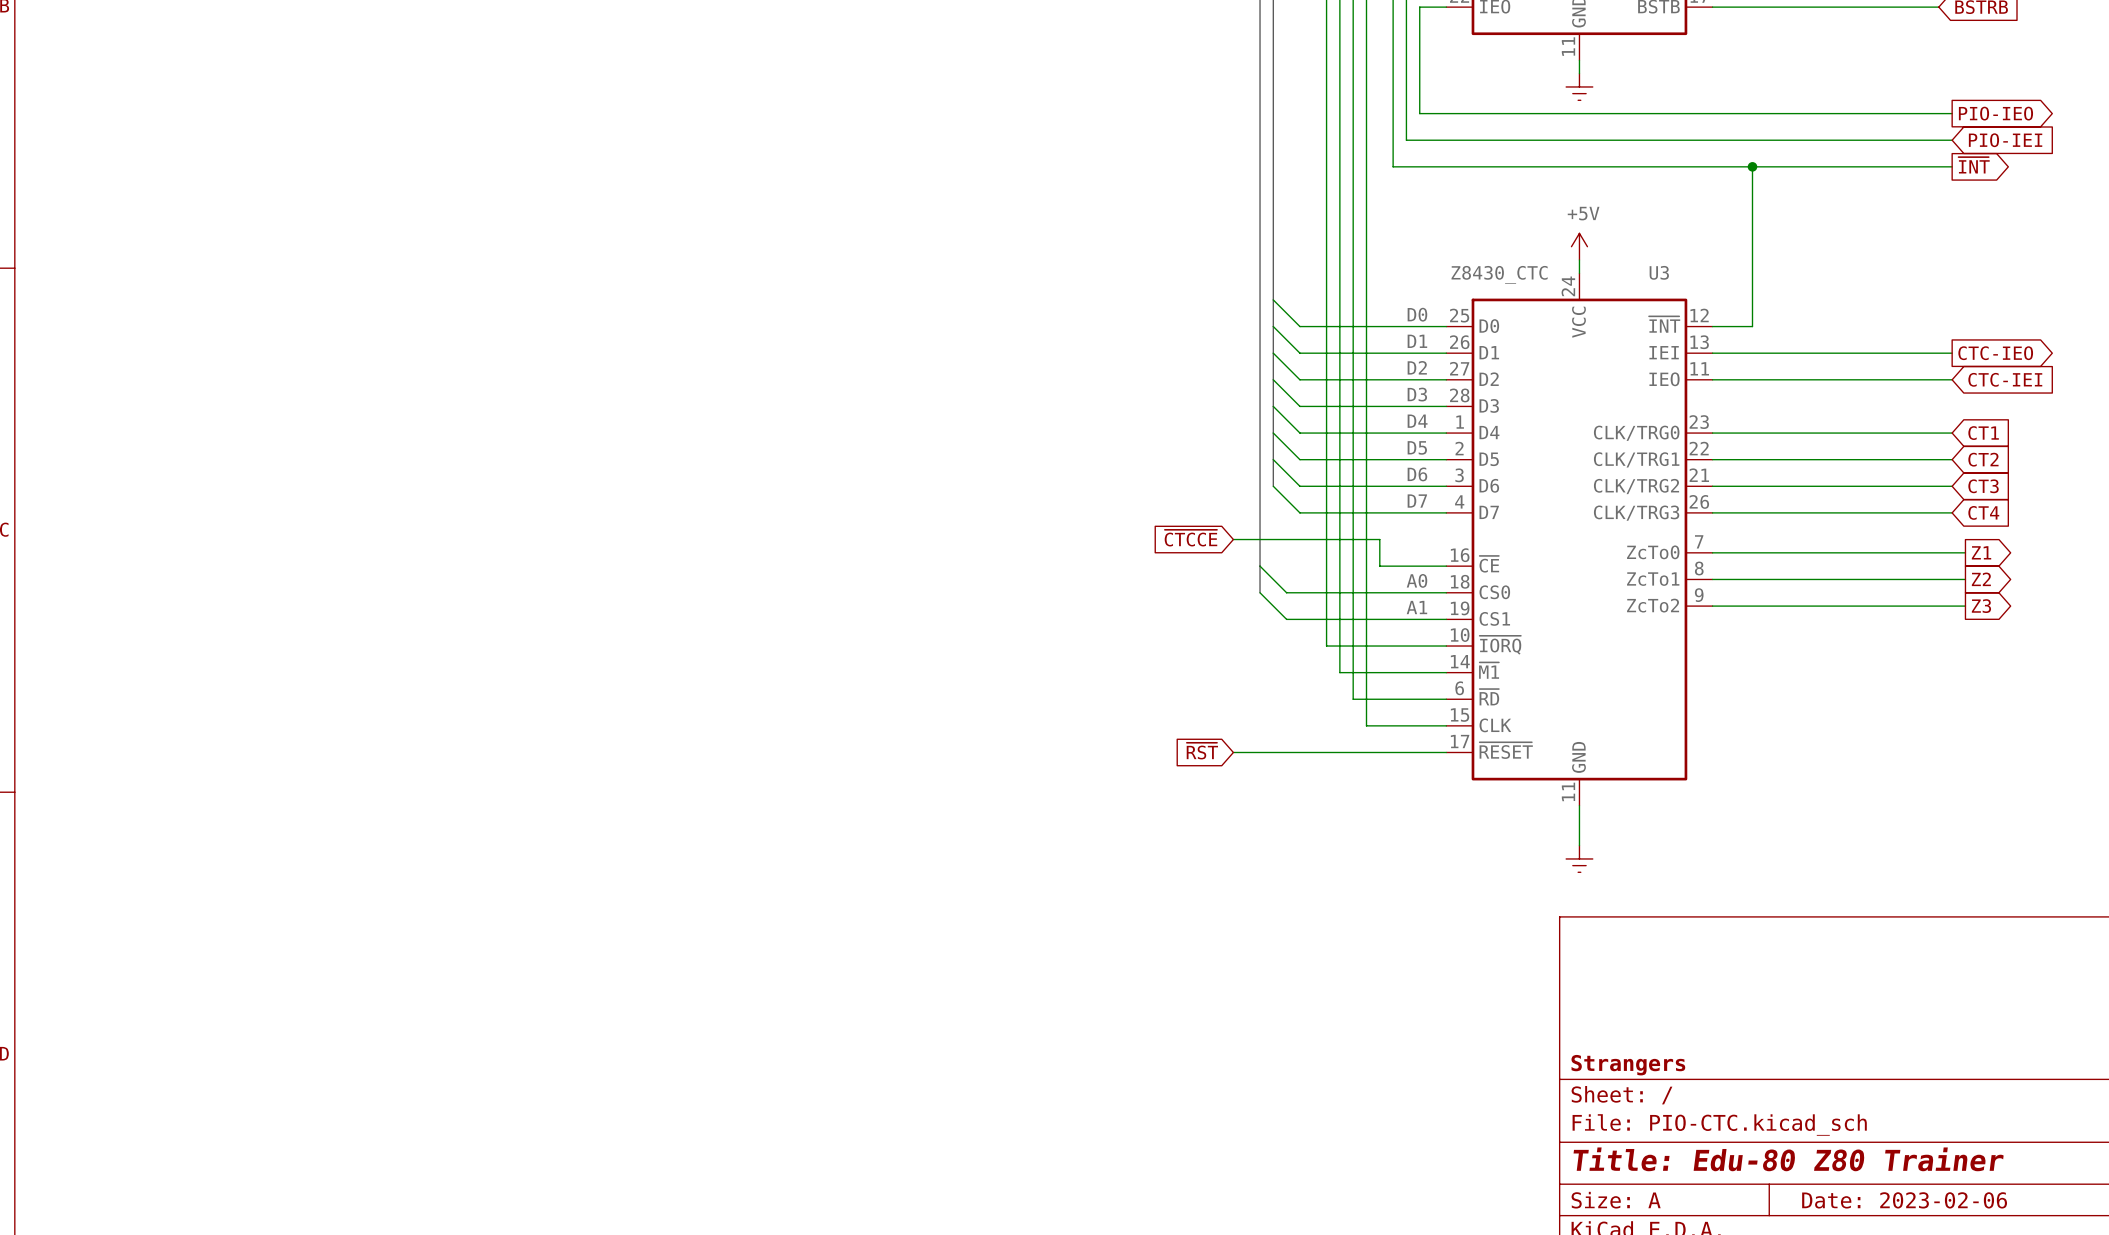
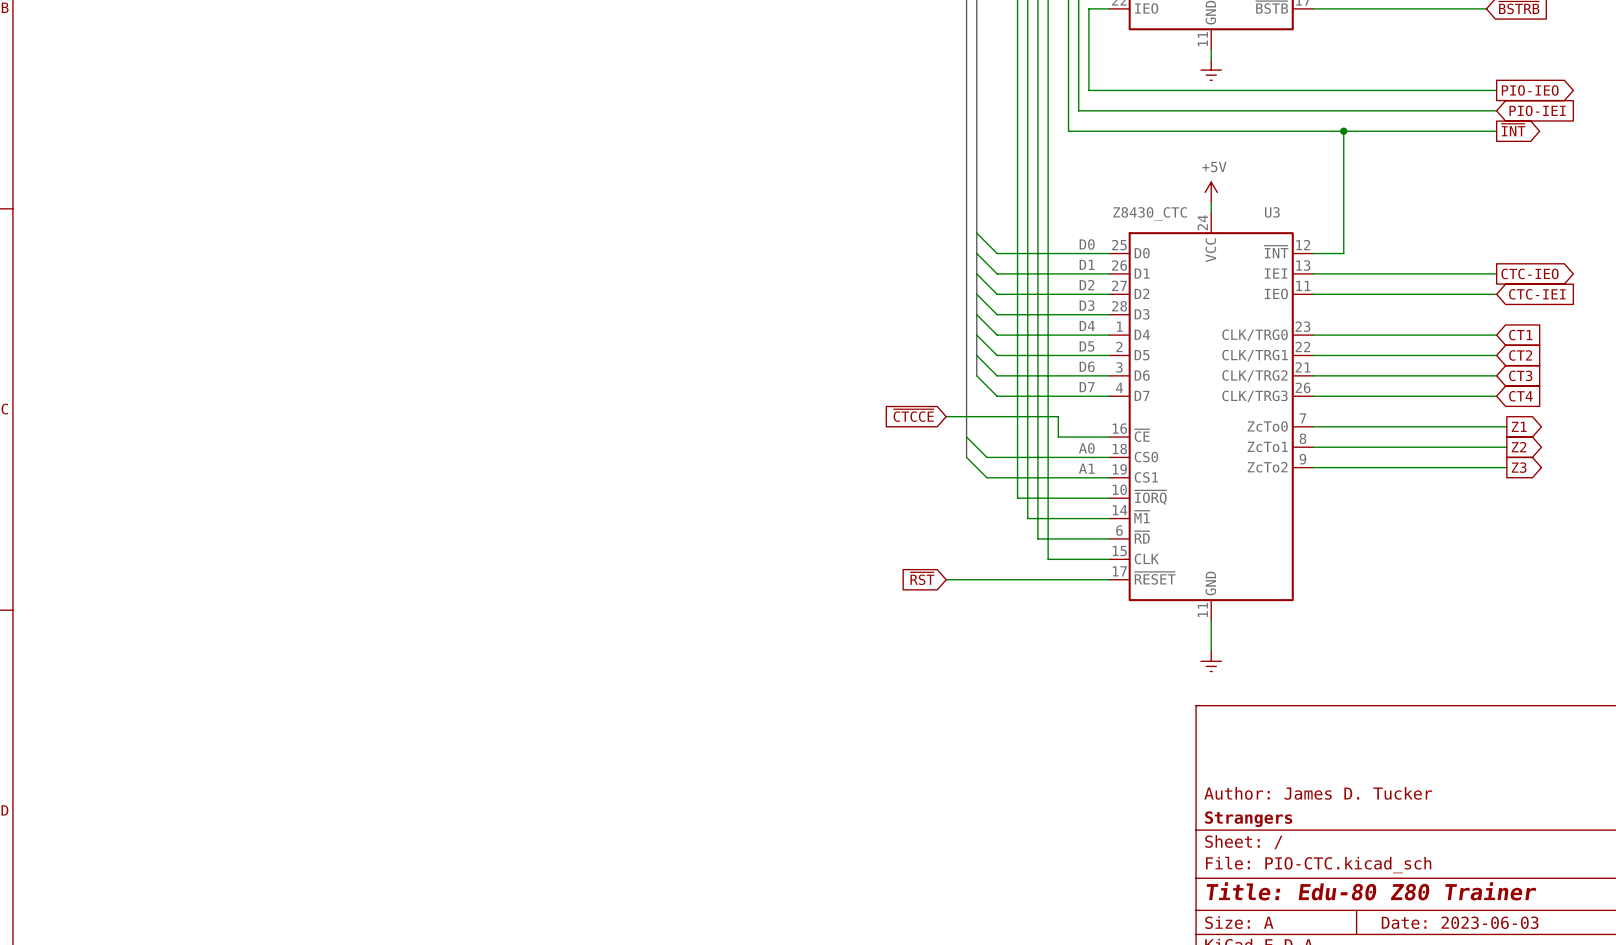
title block: none -> Author: James D. Tucker (1318, 793)
title block: Date: 2023-02-06 (1904, 1200) -> Date: 2023-06-03 (1460, 922)

